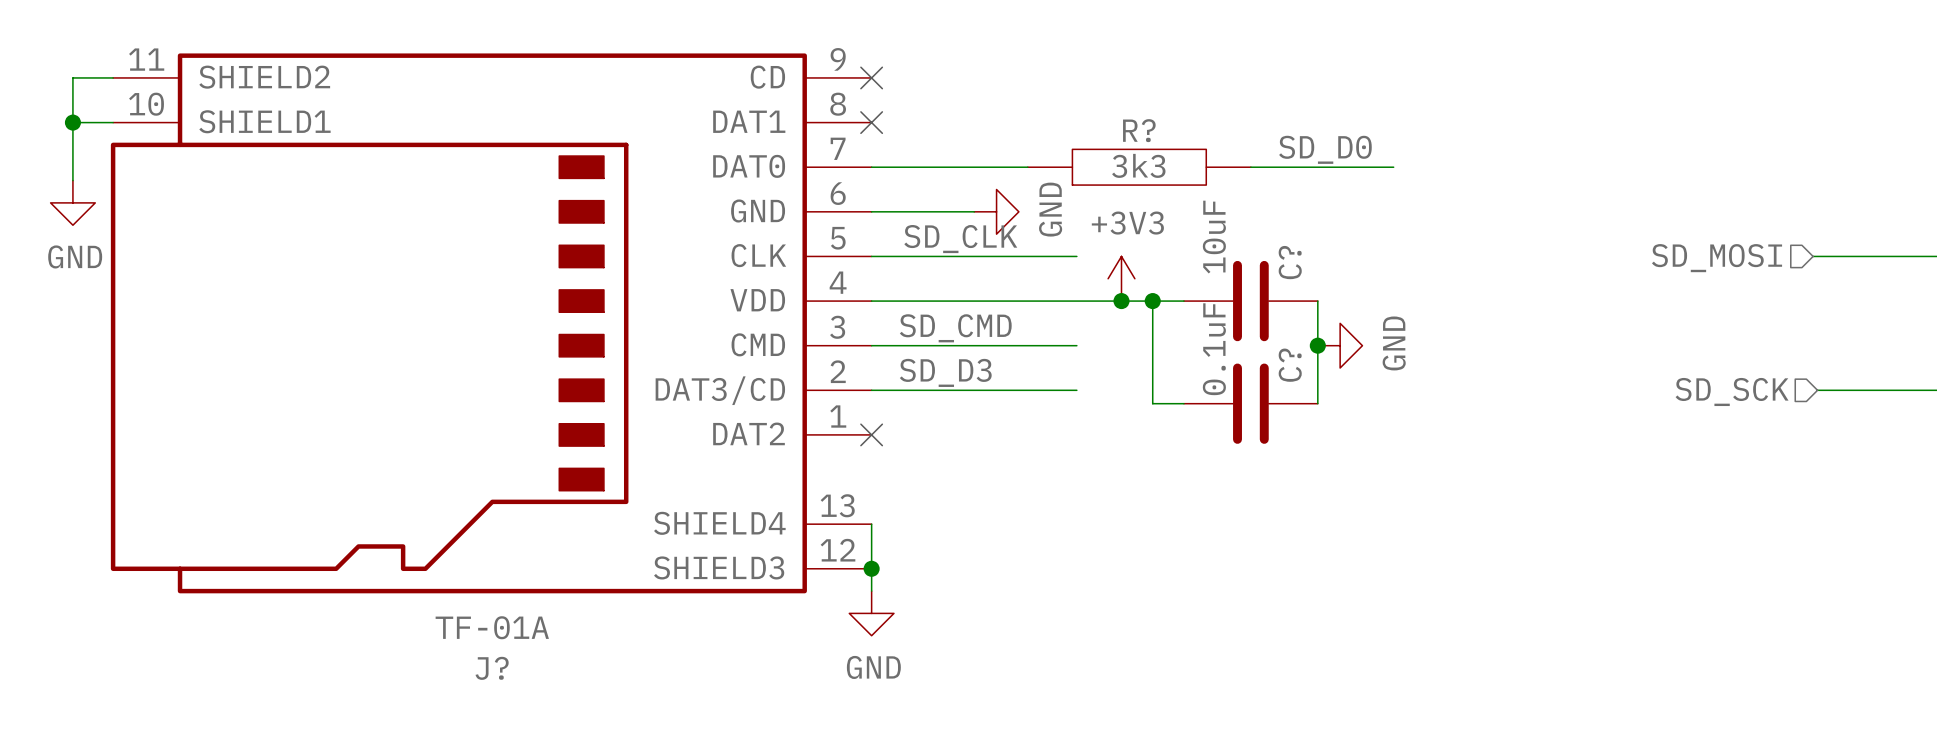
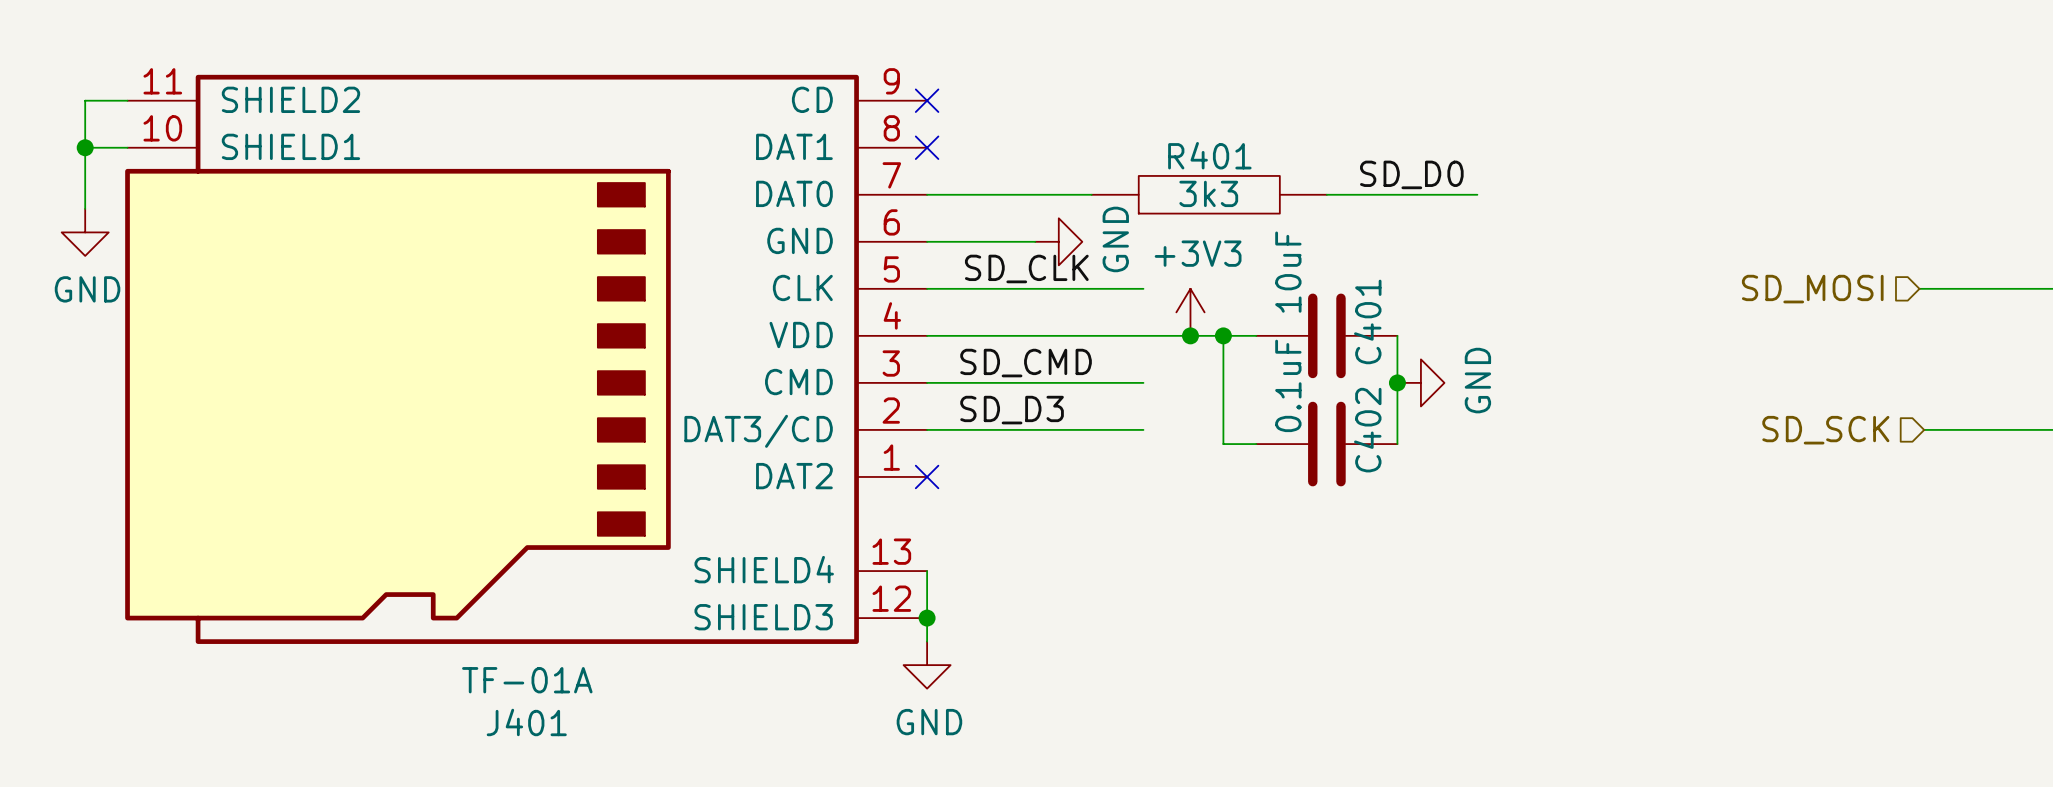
R? name: R? (1139, 130) -> R401 (1209, 155)
C? name: C? (1290, 262) -> C401 (1367, 321)
C? name: C? (1290, 365) -> C402 (1367, 430)
J? name: J? (492, 668) -> J401 (526, 722)

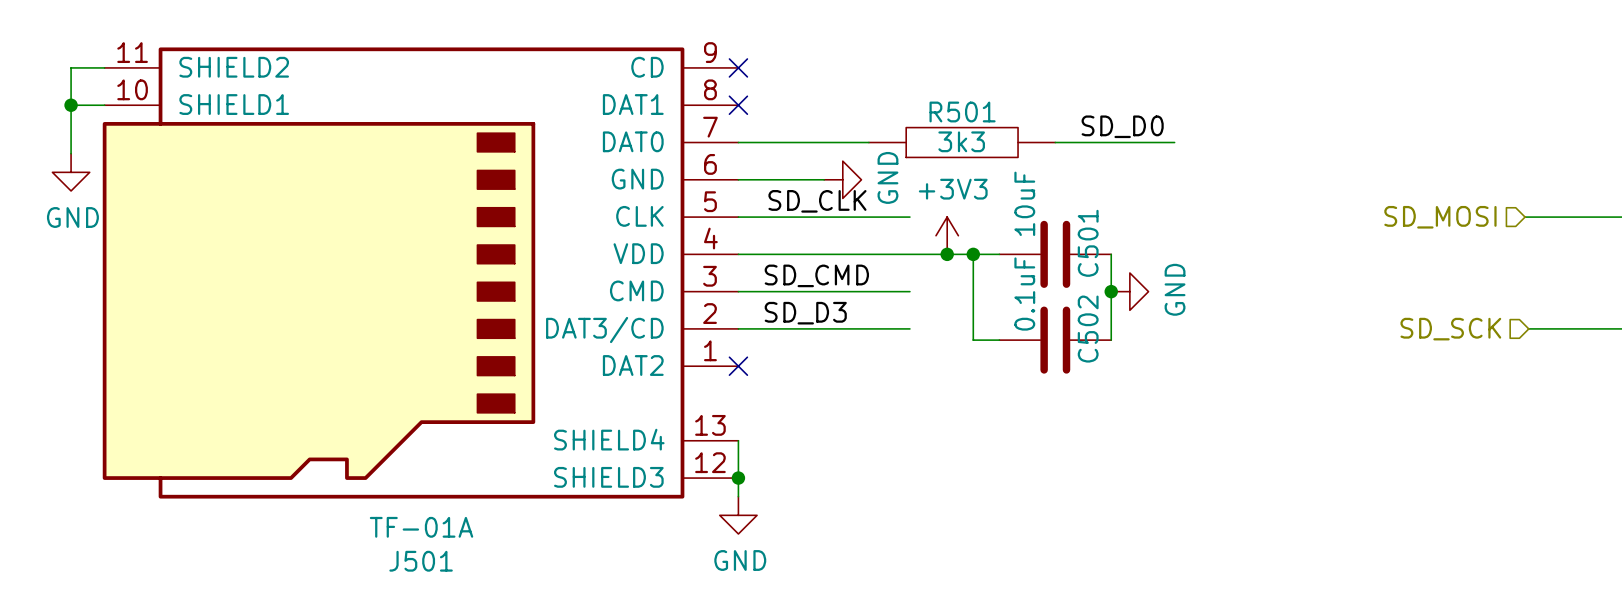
R401 name: R401 (1209, 155) -> R501 (962, 111)
C401 name: C401 (1367, 321) -> C501 (1088, 243)
C402 name: C402 (1367, 430) -> C502 (1088, 329)
J401 name: J401 (526, 722) -> J501 (421, 561)

